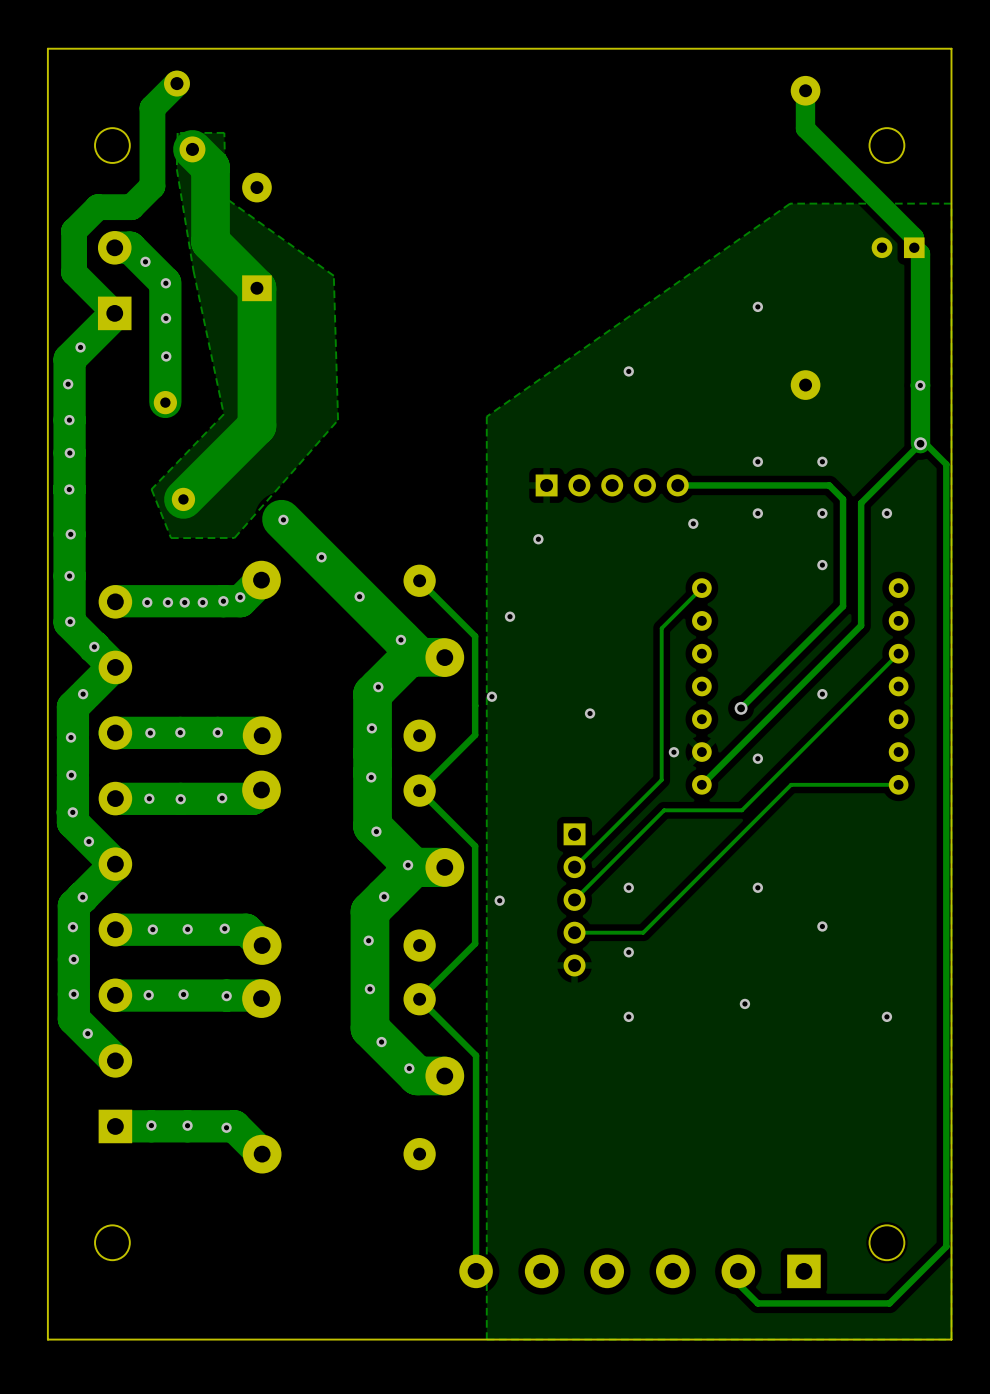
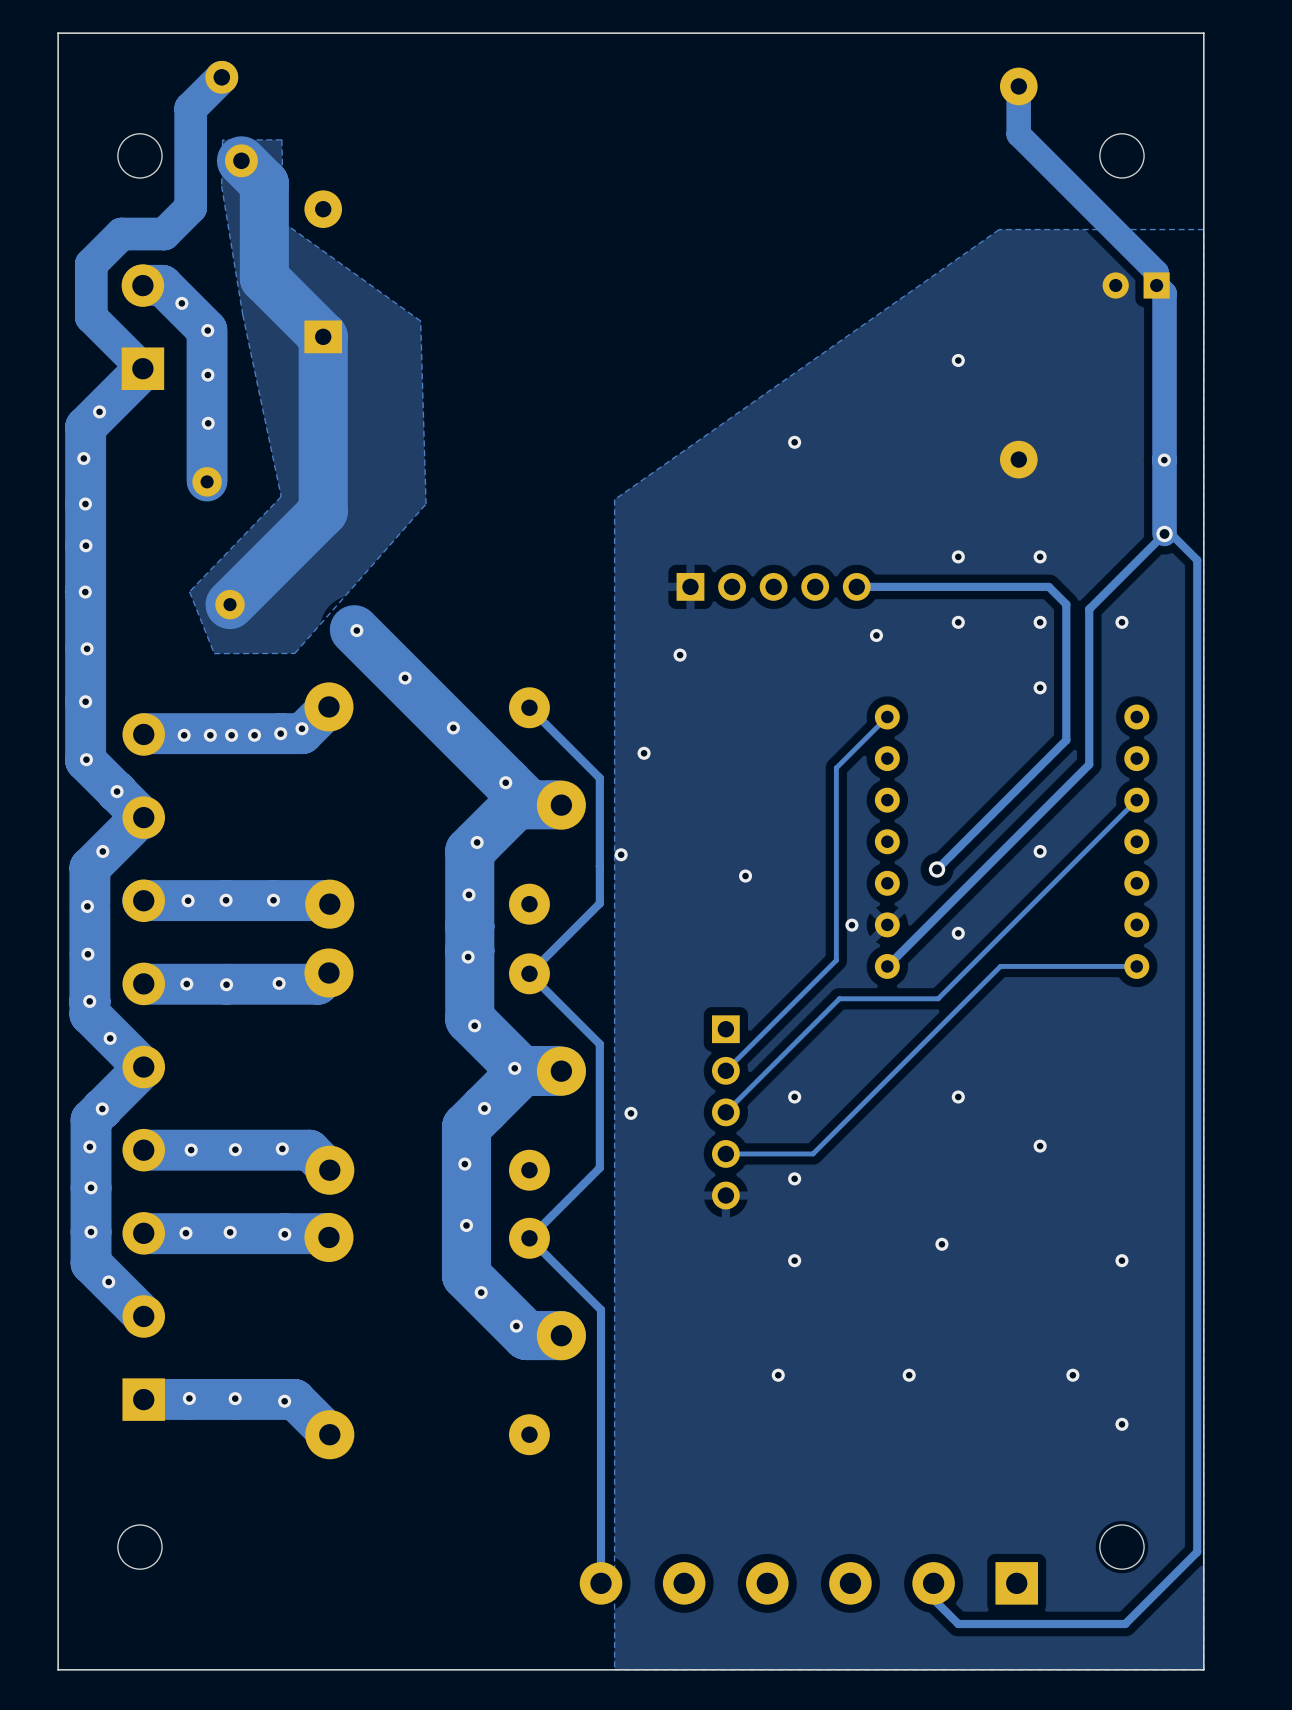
via: none -> (778, 1375)
via: none -> (909, 1375)
via: none -> (1072, 1375)
via: none -> (1121, 1424)

